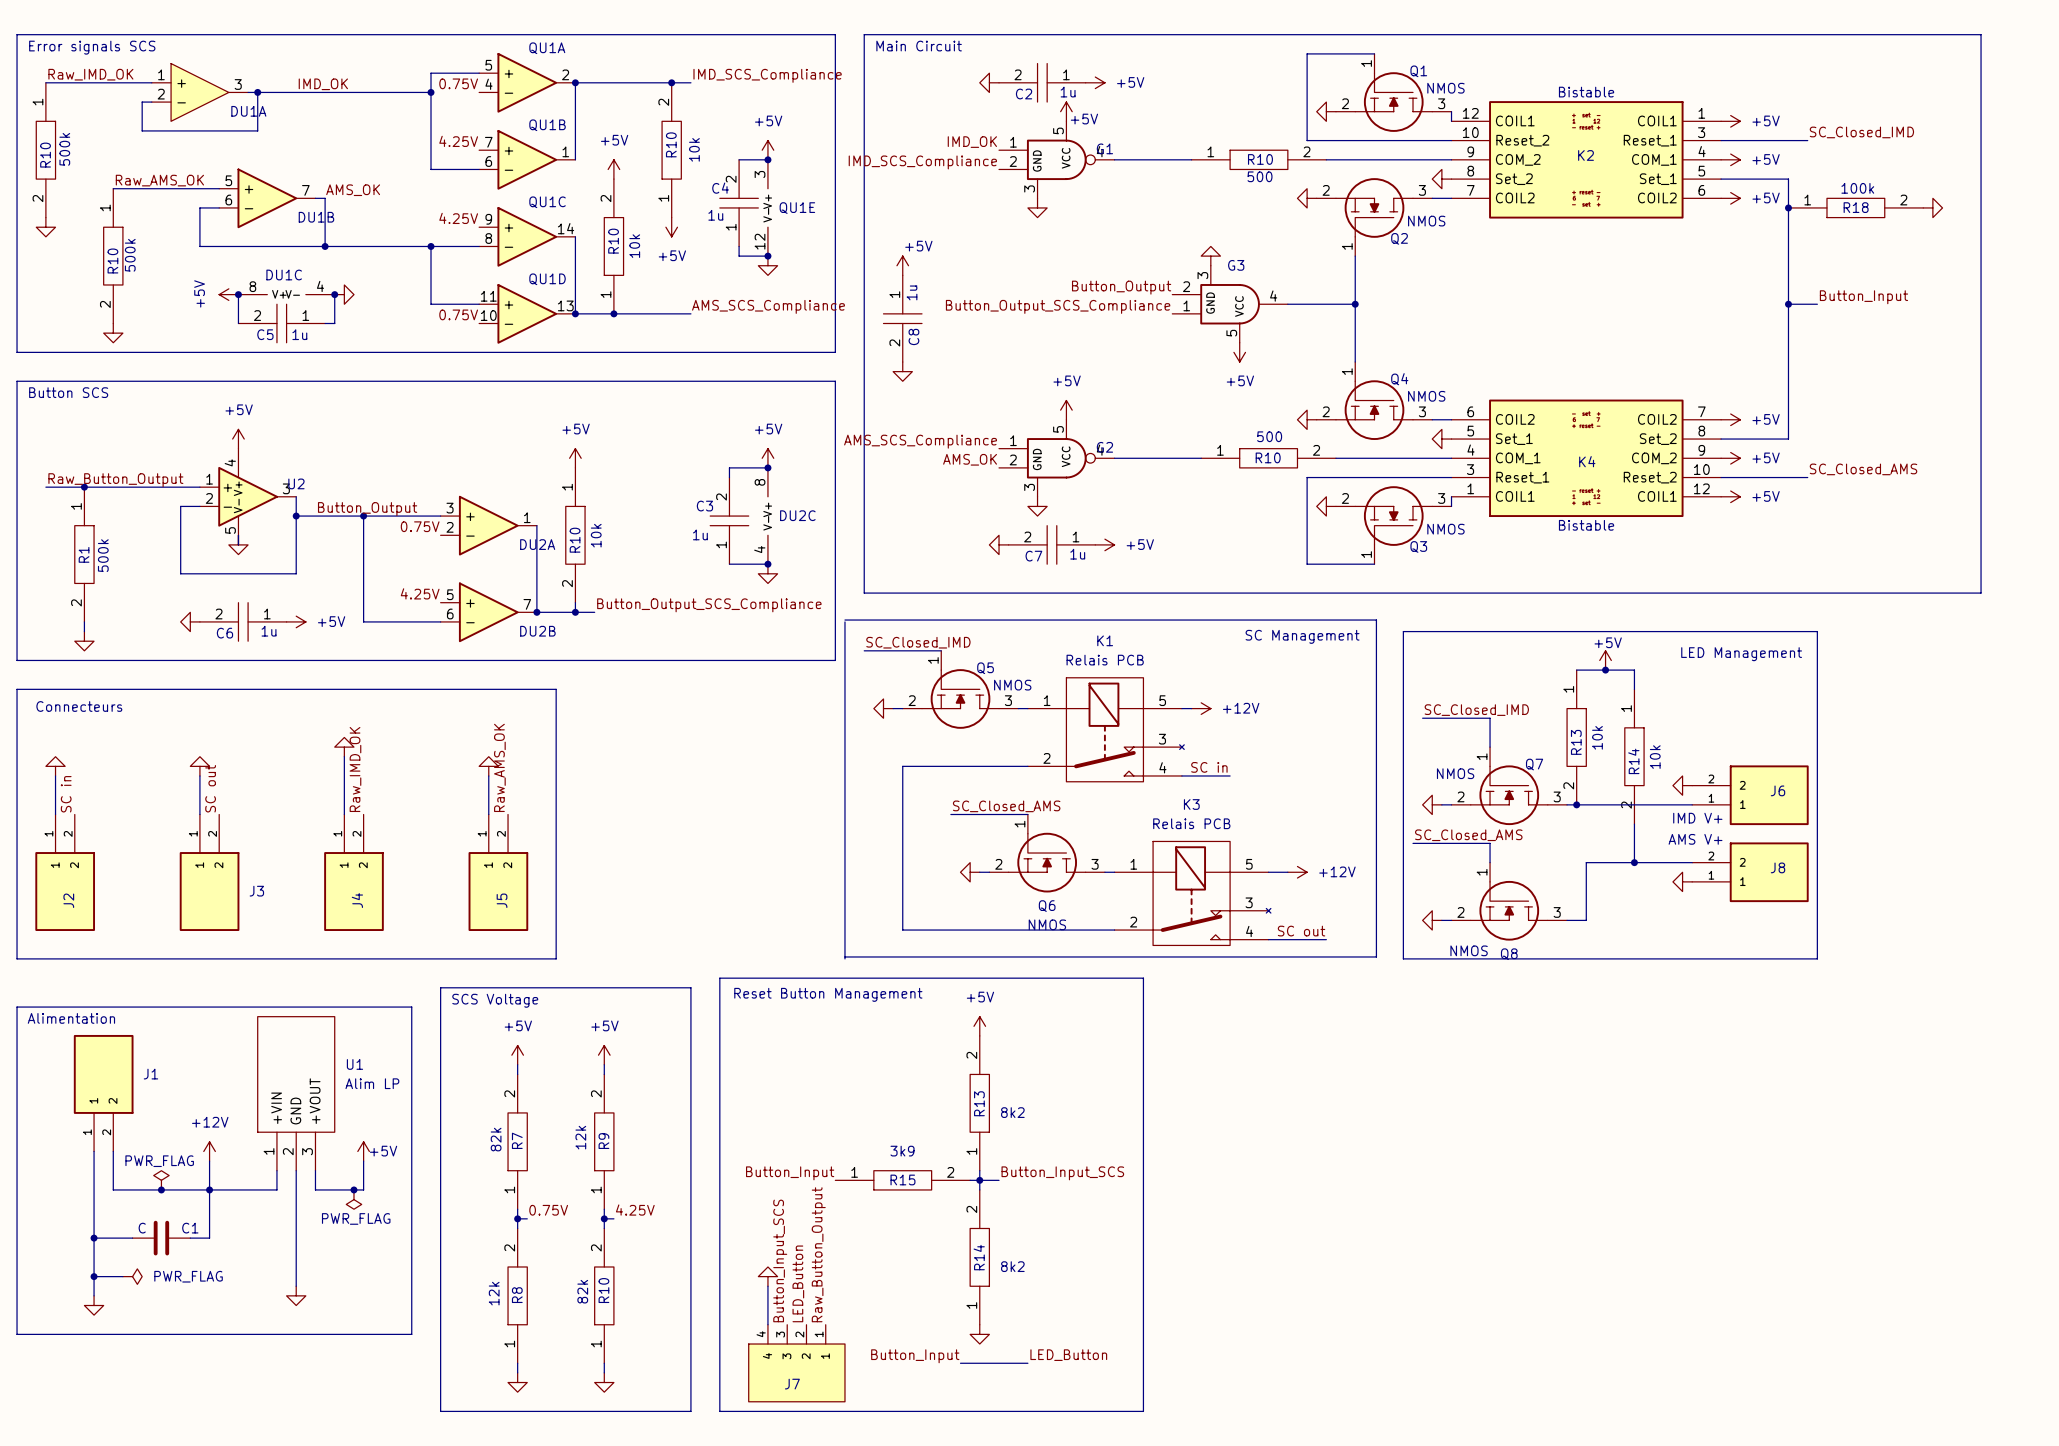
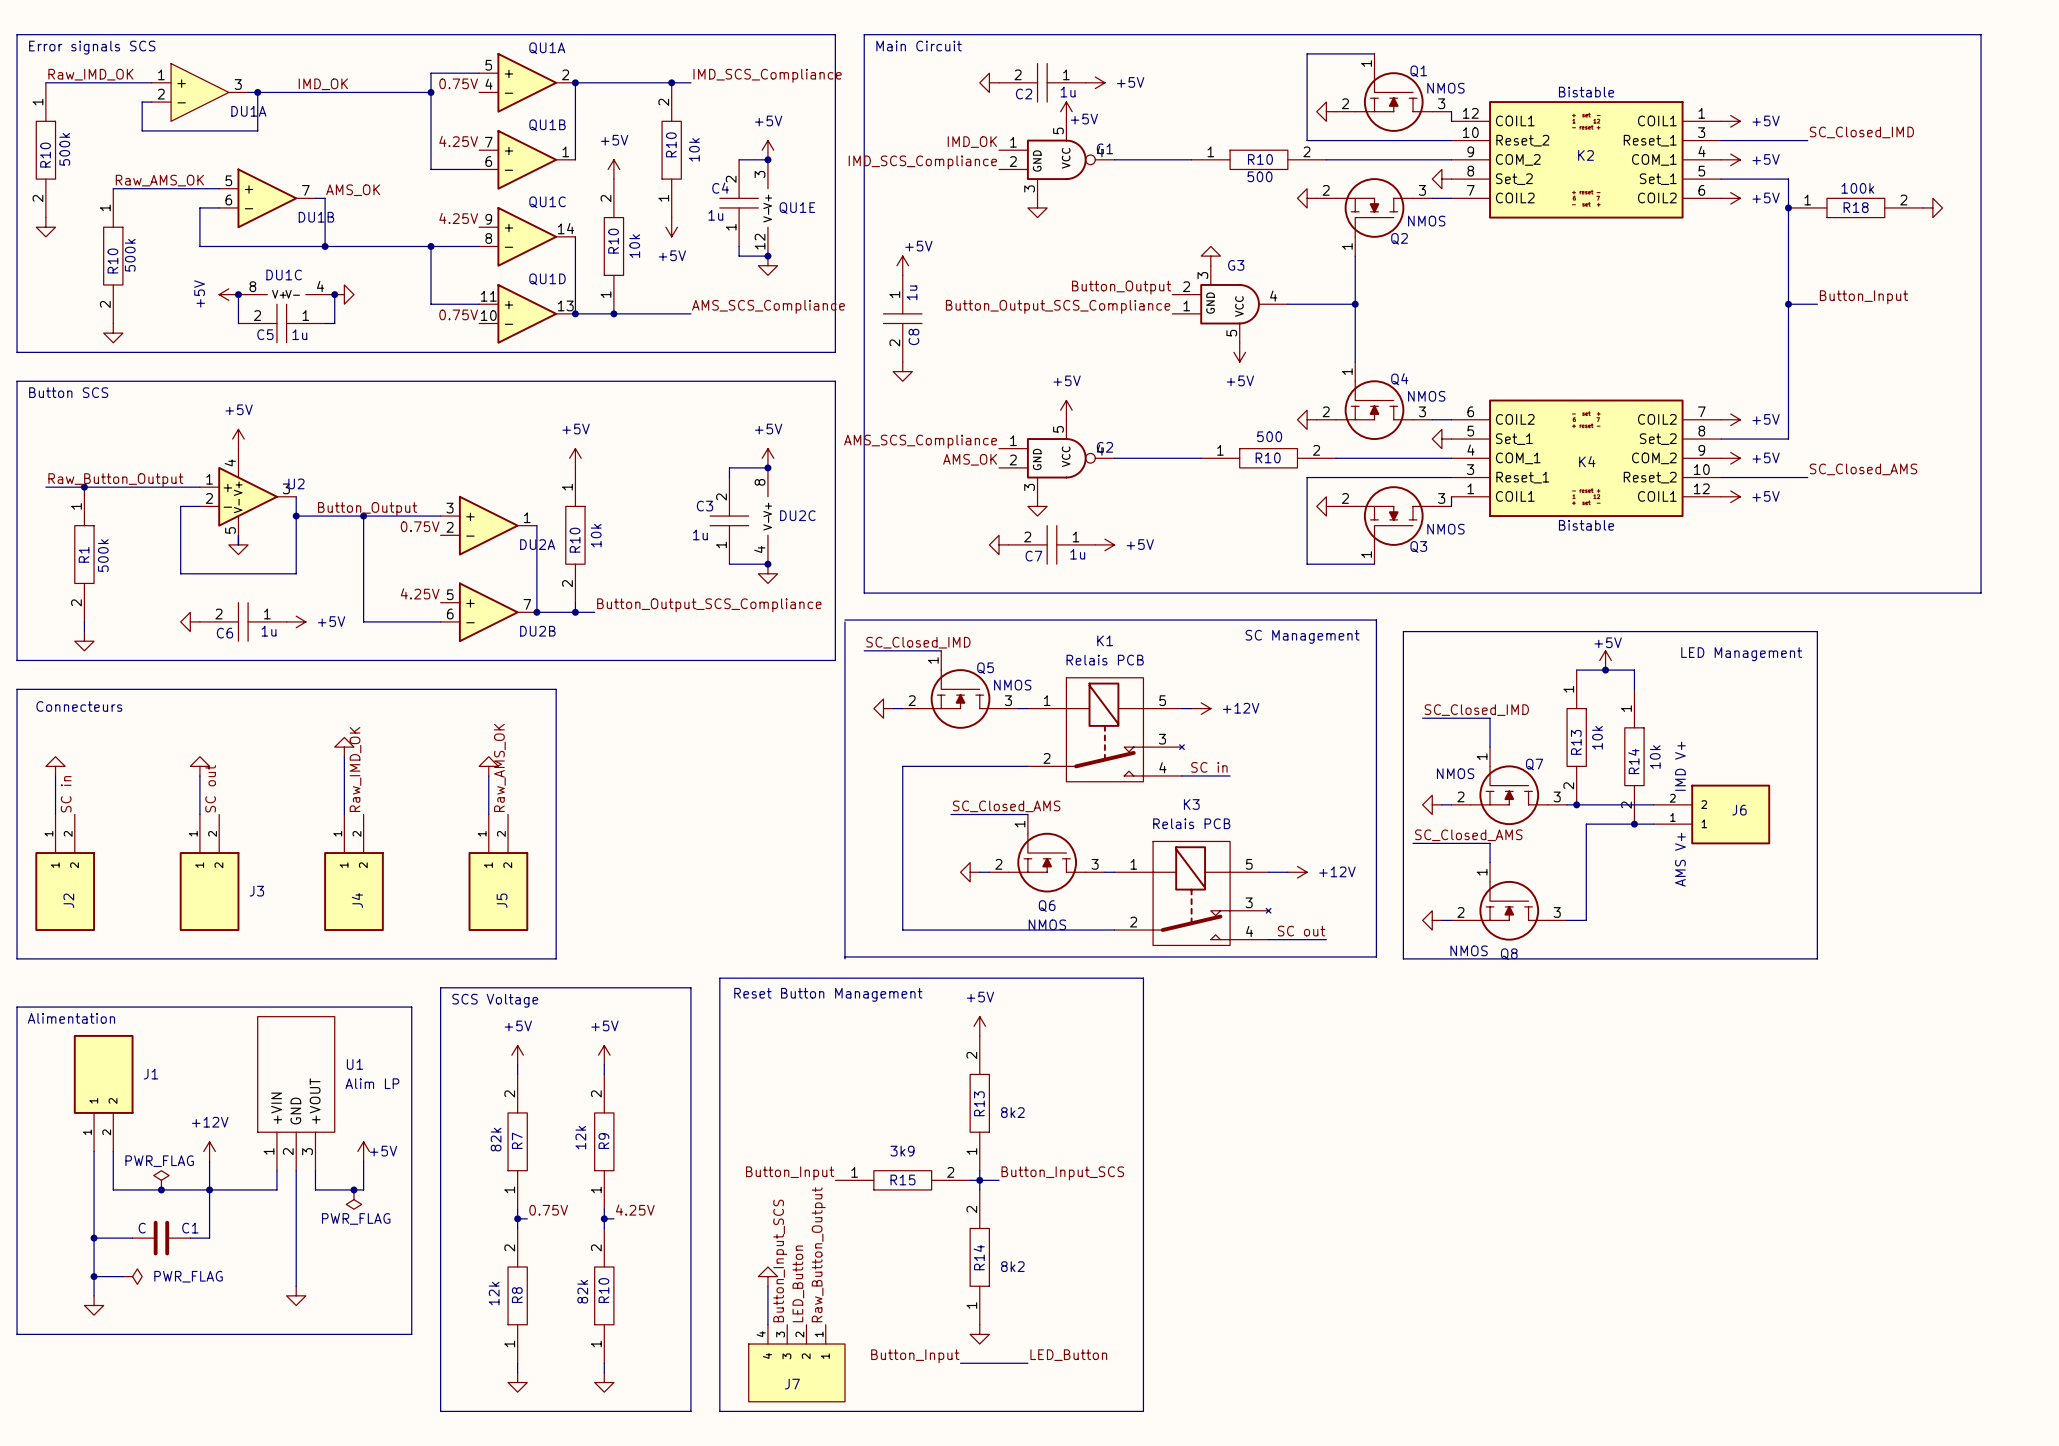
power symbol: (1682, 785) -> none
J6 position: (1750, 795) -> (1711, 814)
text rotation: 0° (1697, 818) -> 90° counterclockwise (1680, 766)
wire: (1634, 824) (1634, 862) -> none
text rotation: 0° (1695, 839) -> 90° counterclockwise (1680, 859)
wire: (1586, 862) (1692, 862) -> (1586, 862) (1586, 824) (1653, 824)
junction position: (1634, 862) -> (1634, 824)
J8: (1750, 872) -> none
power symbol: (1682, 881) -> none

